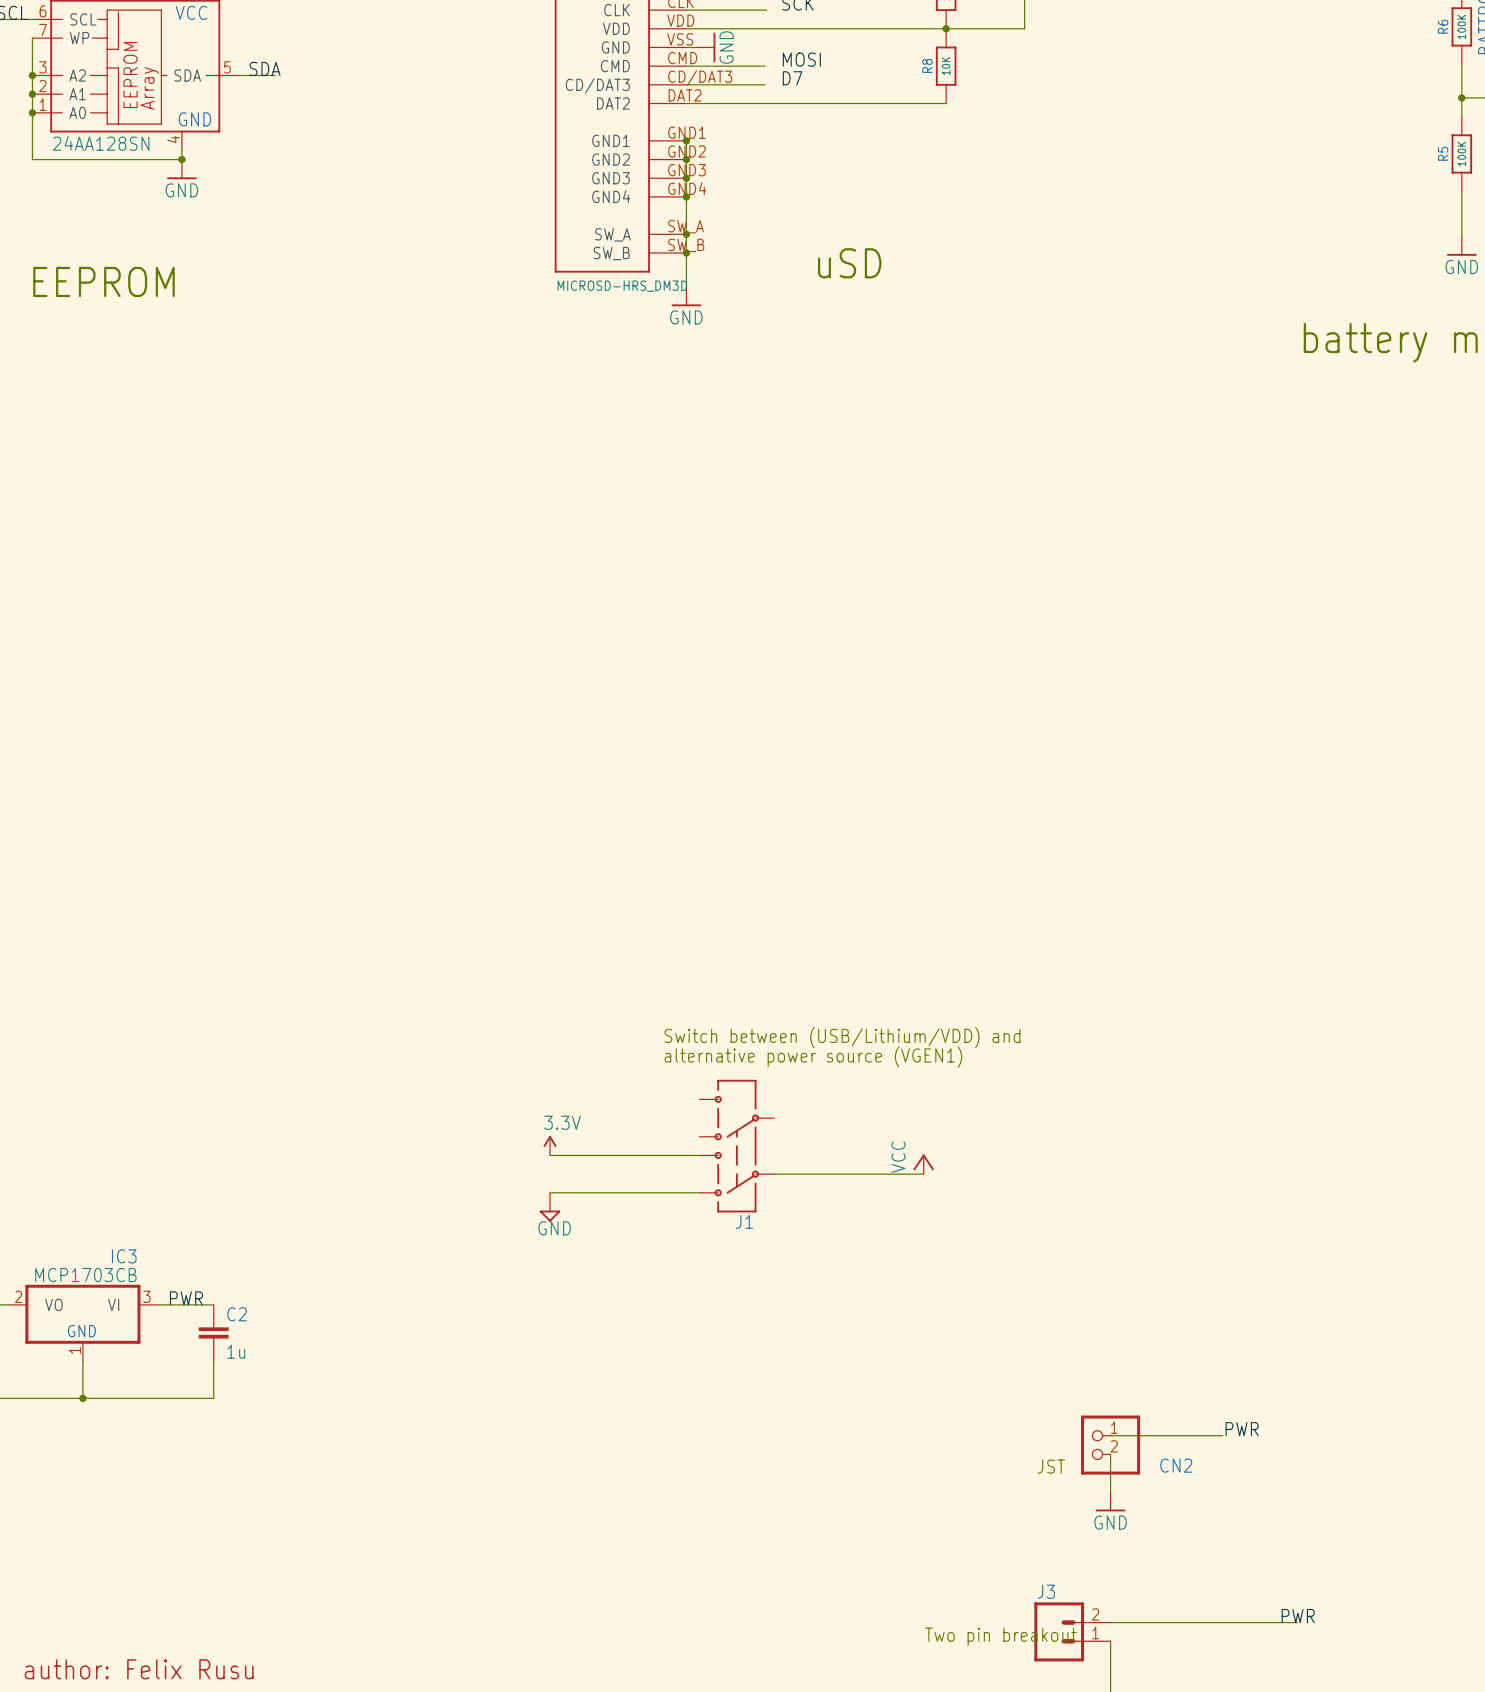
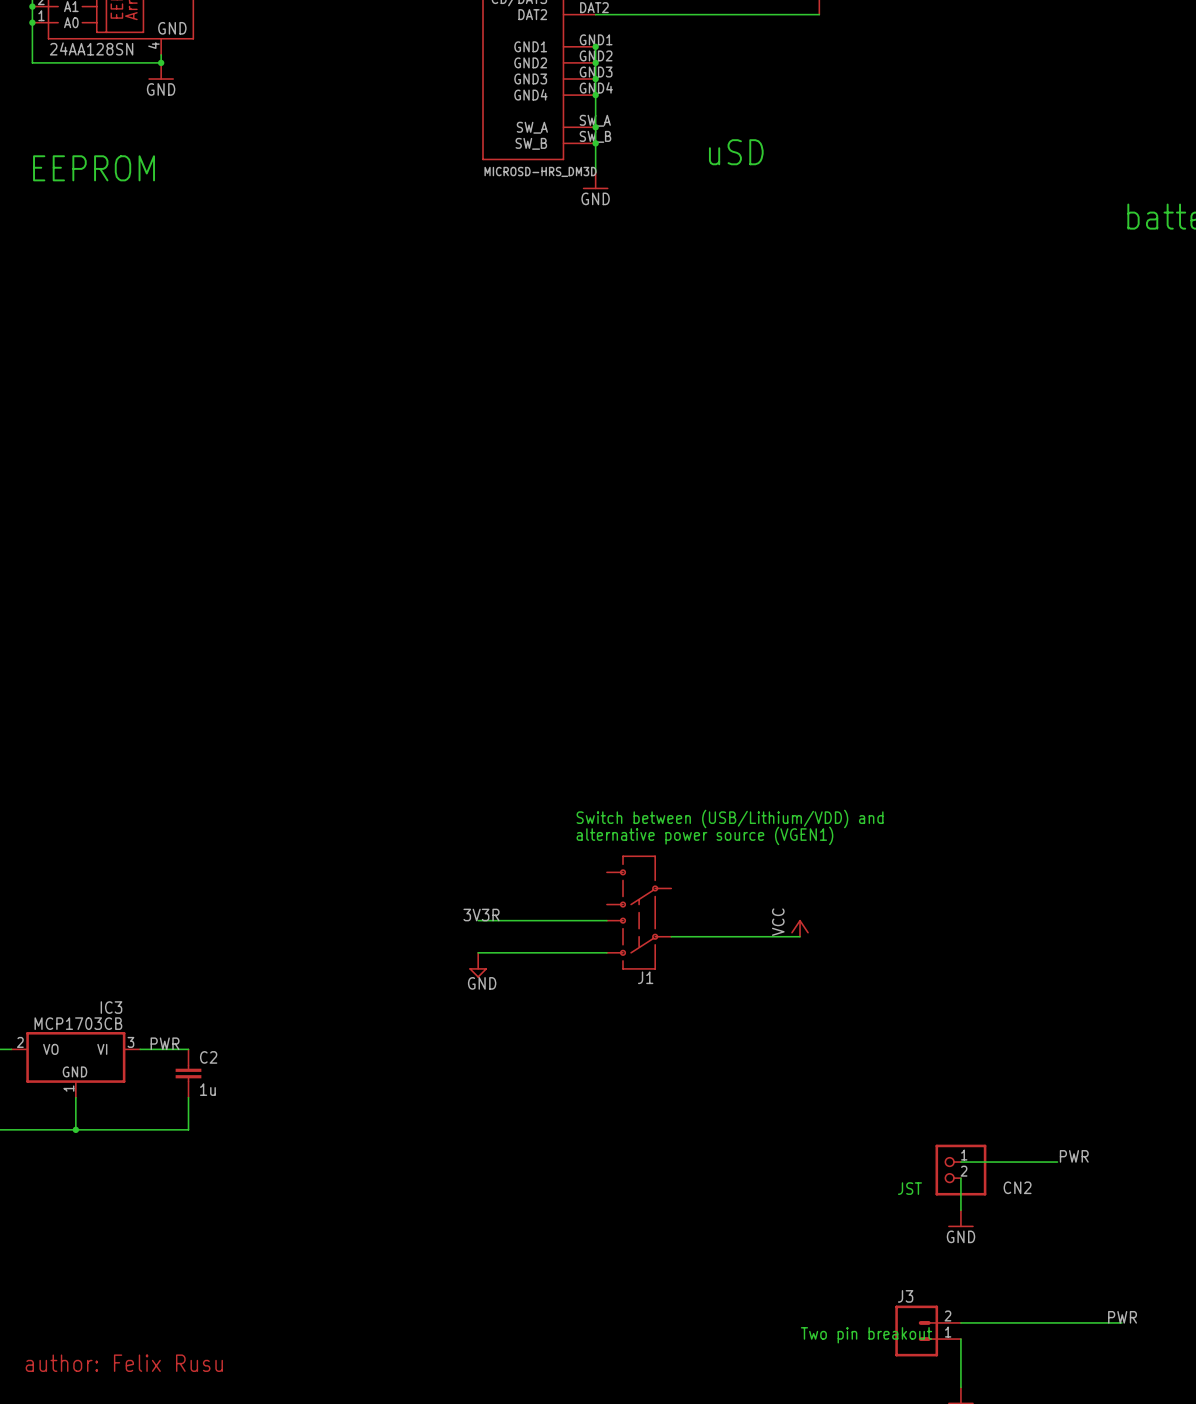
power symbol: 3.3V (550, 1145) -> none
label: none -> 3V3R (481, 915)

